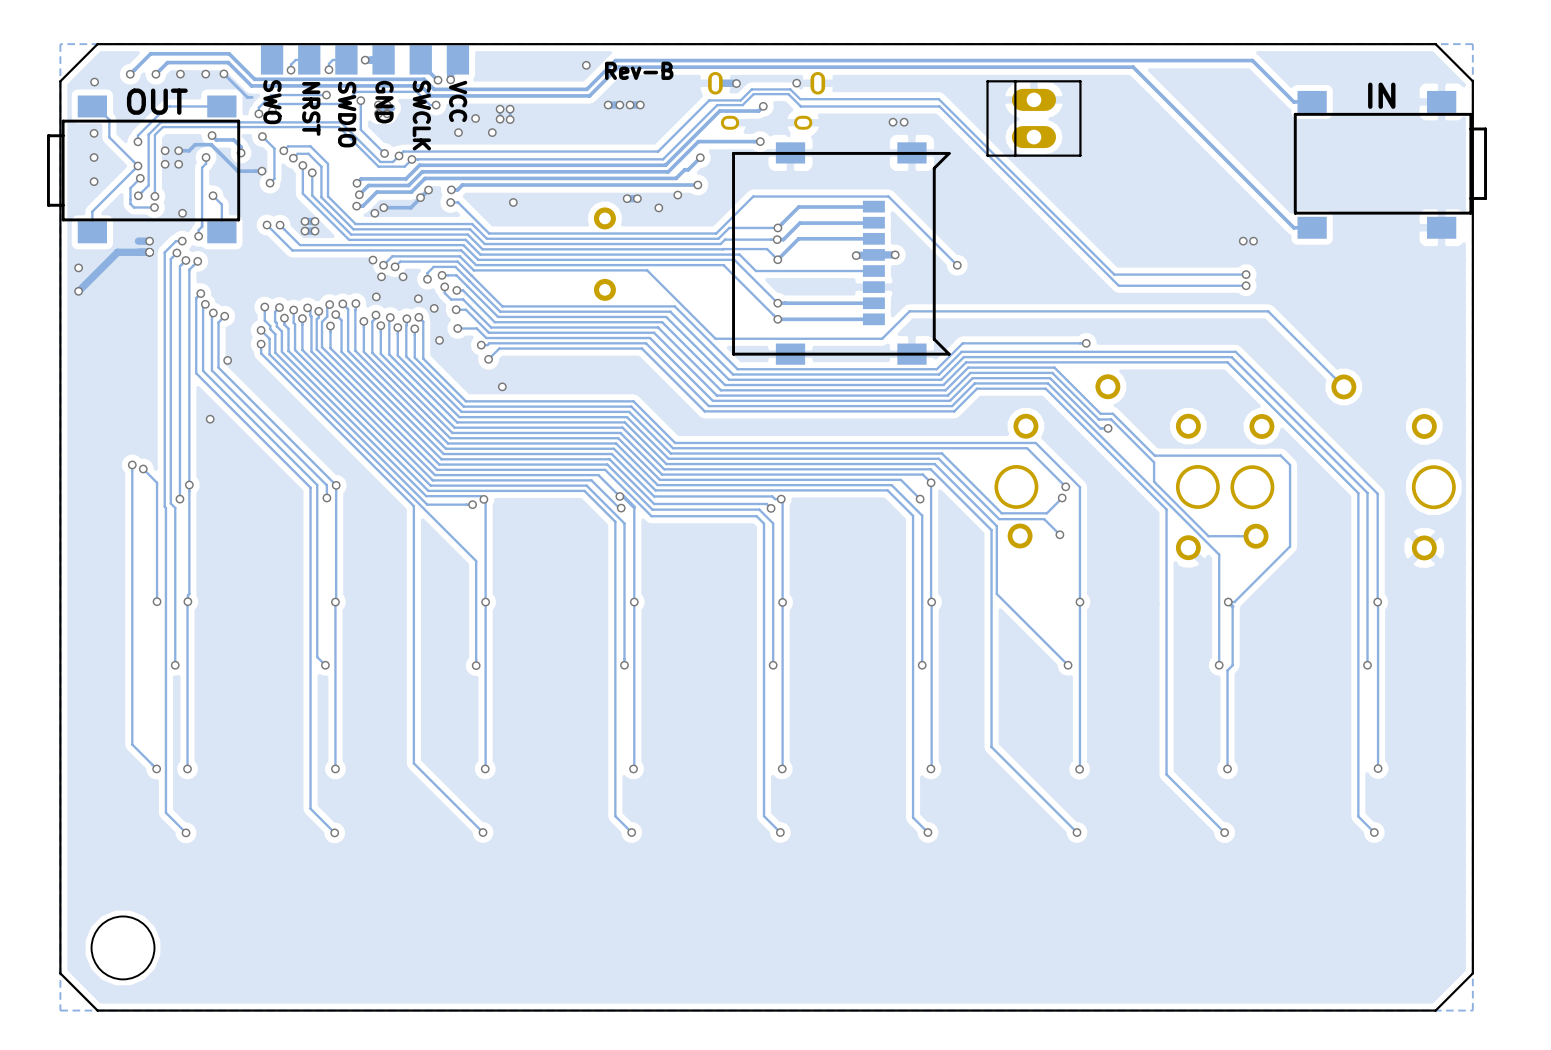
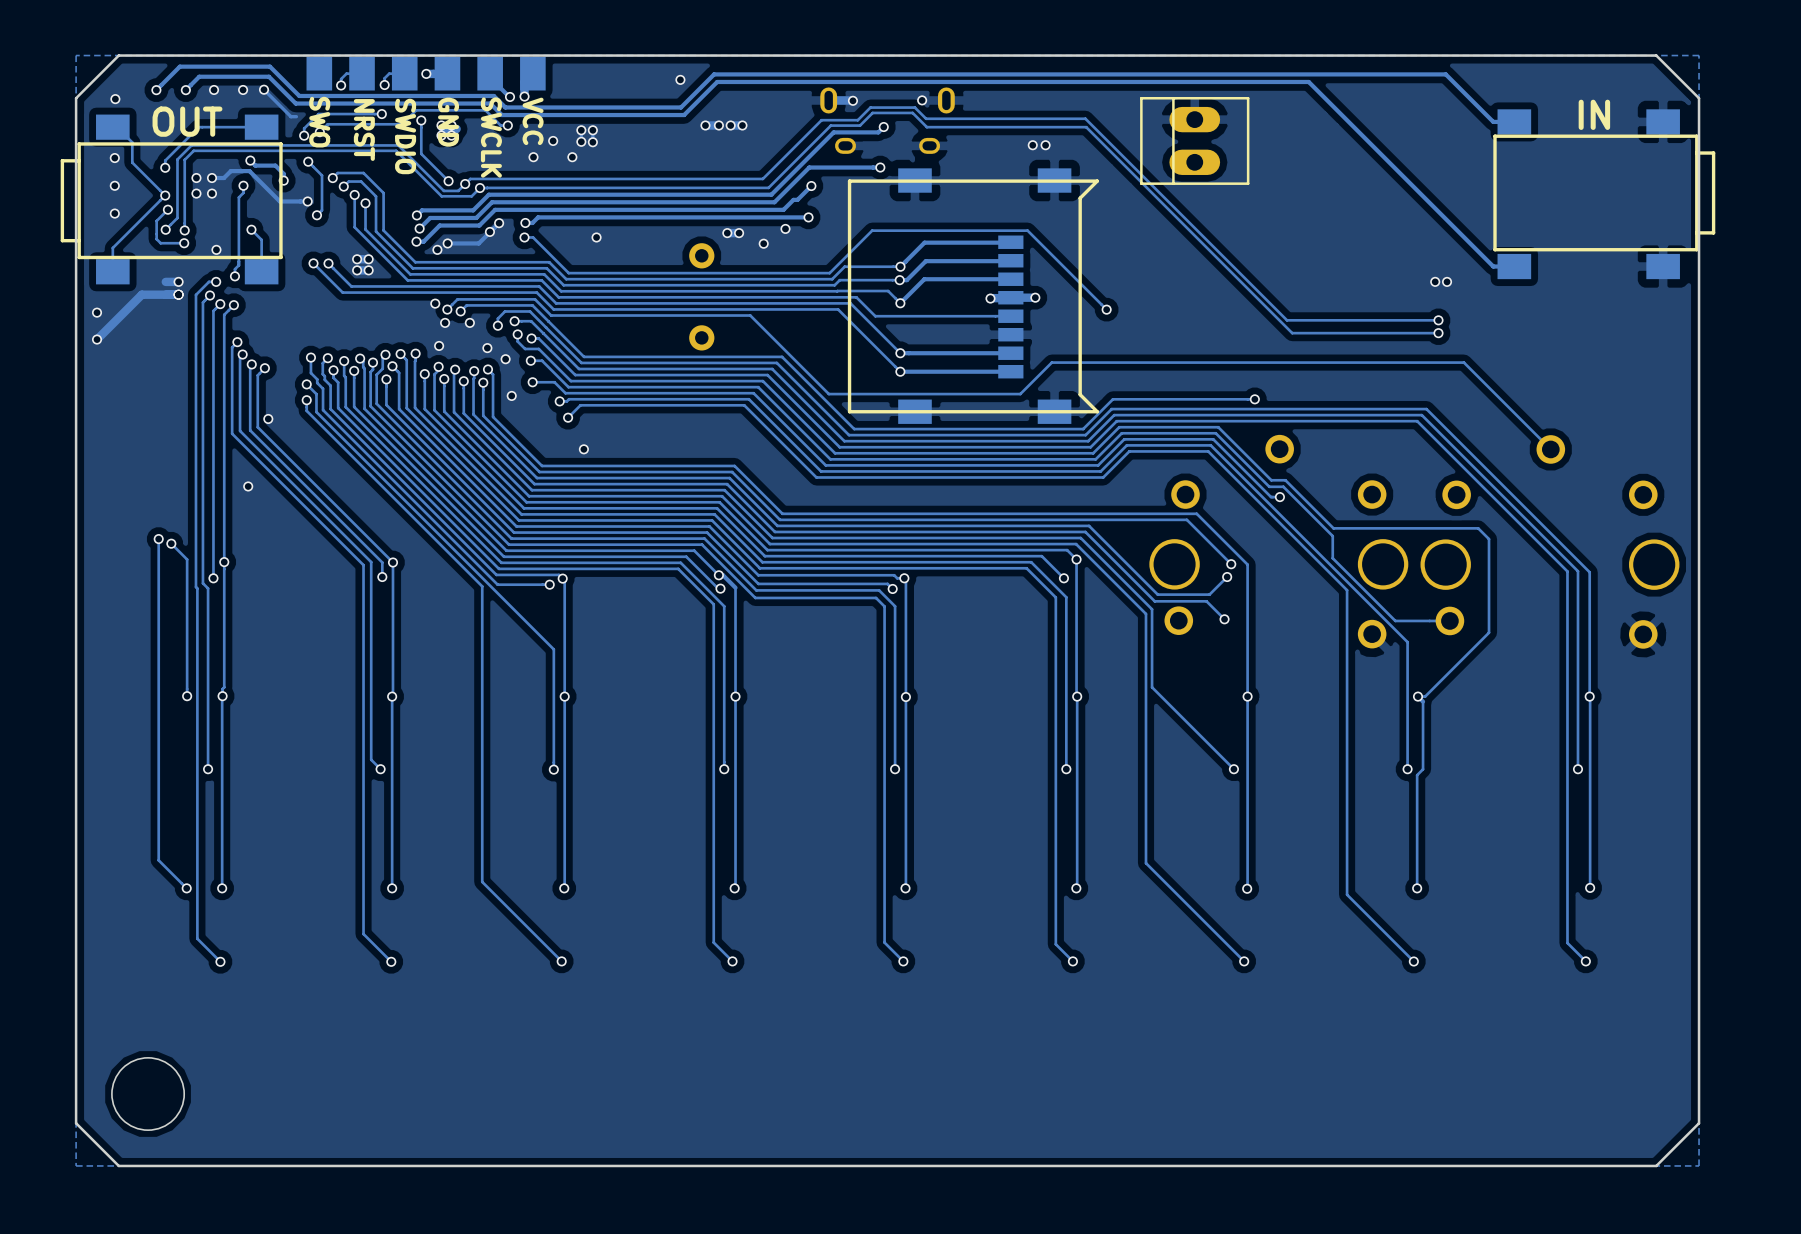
text: Rev-B (639, 70) -> none

